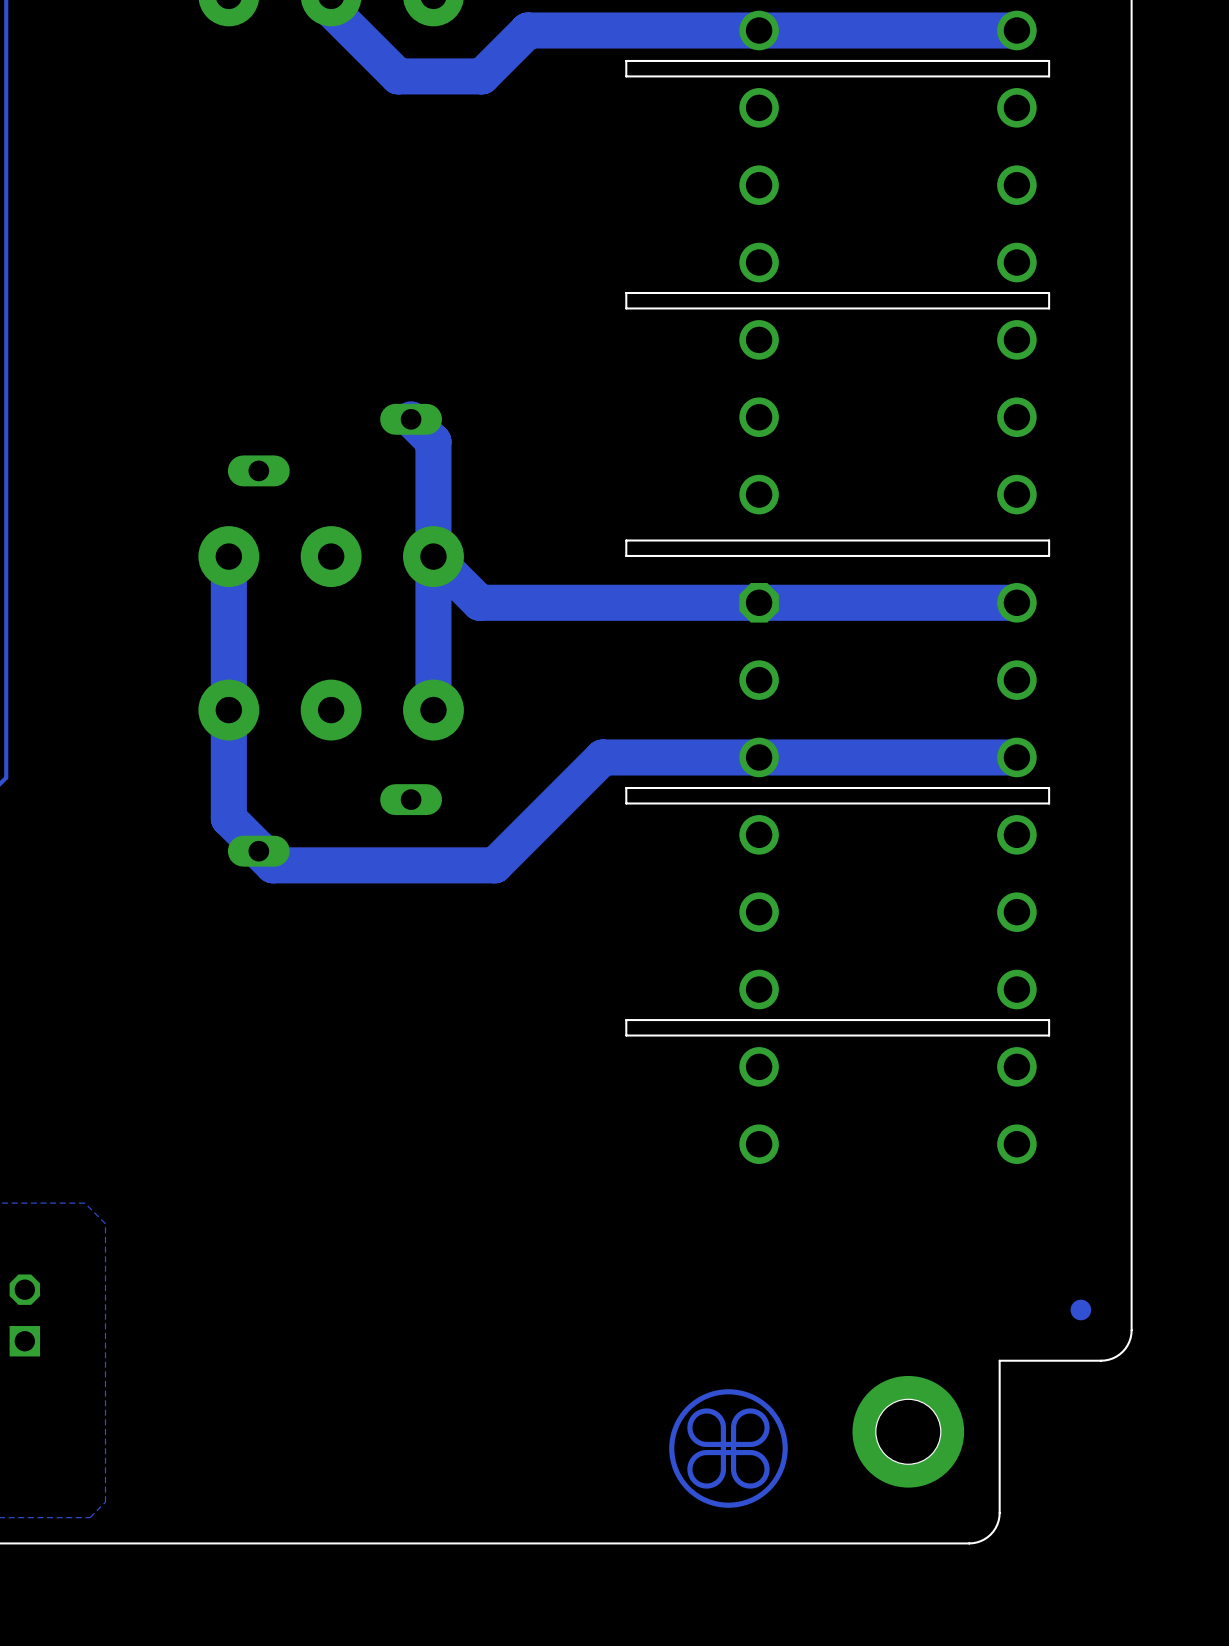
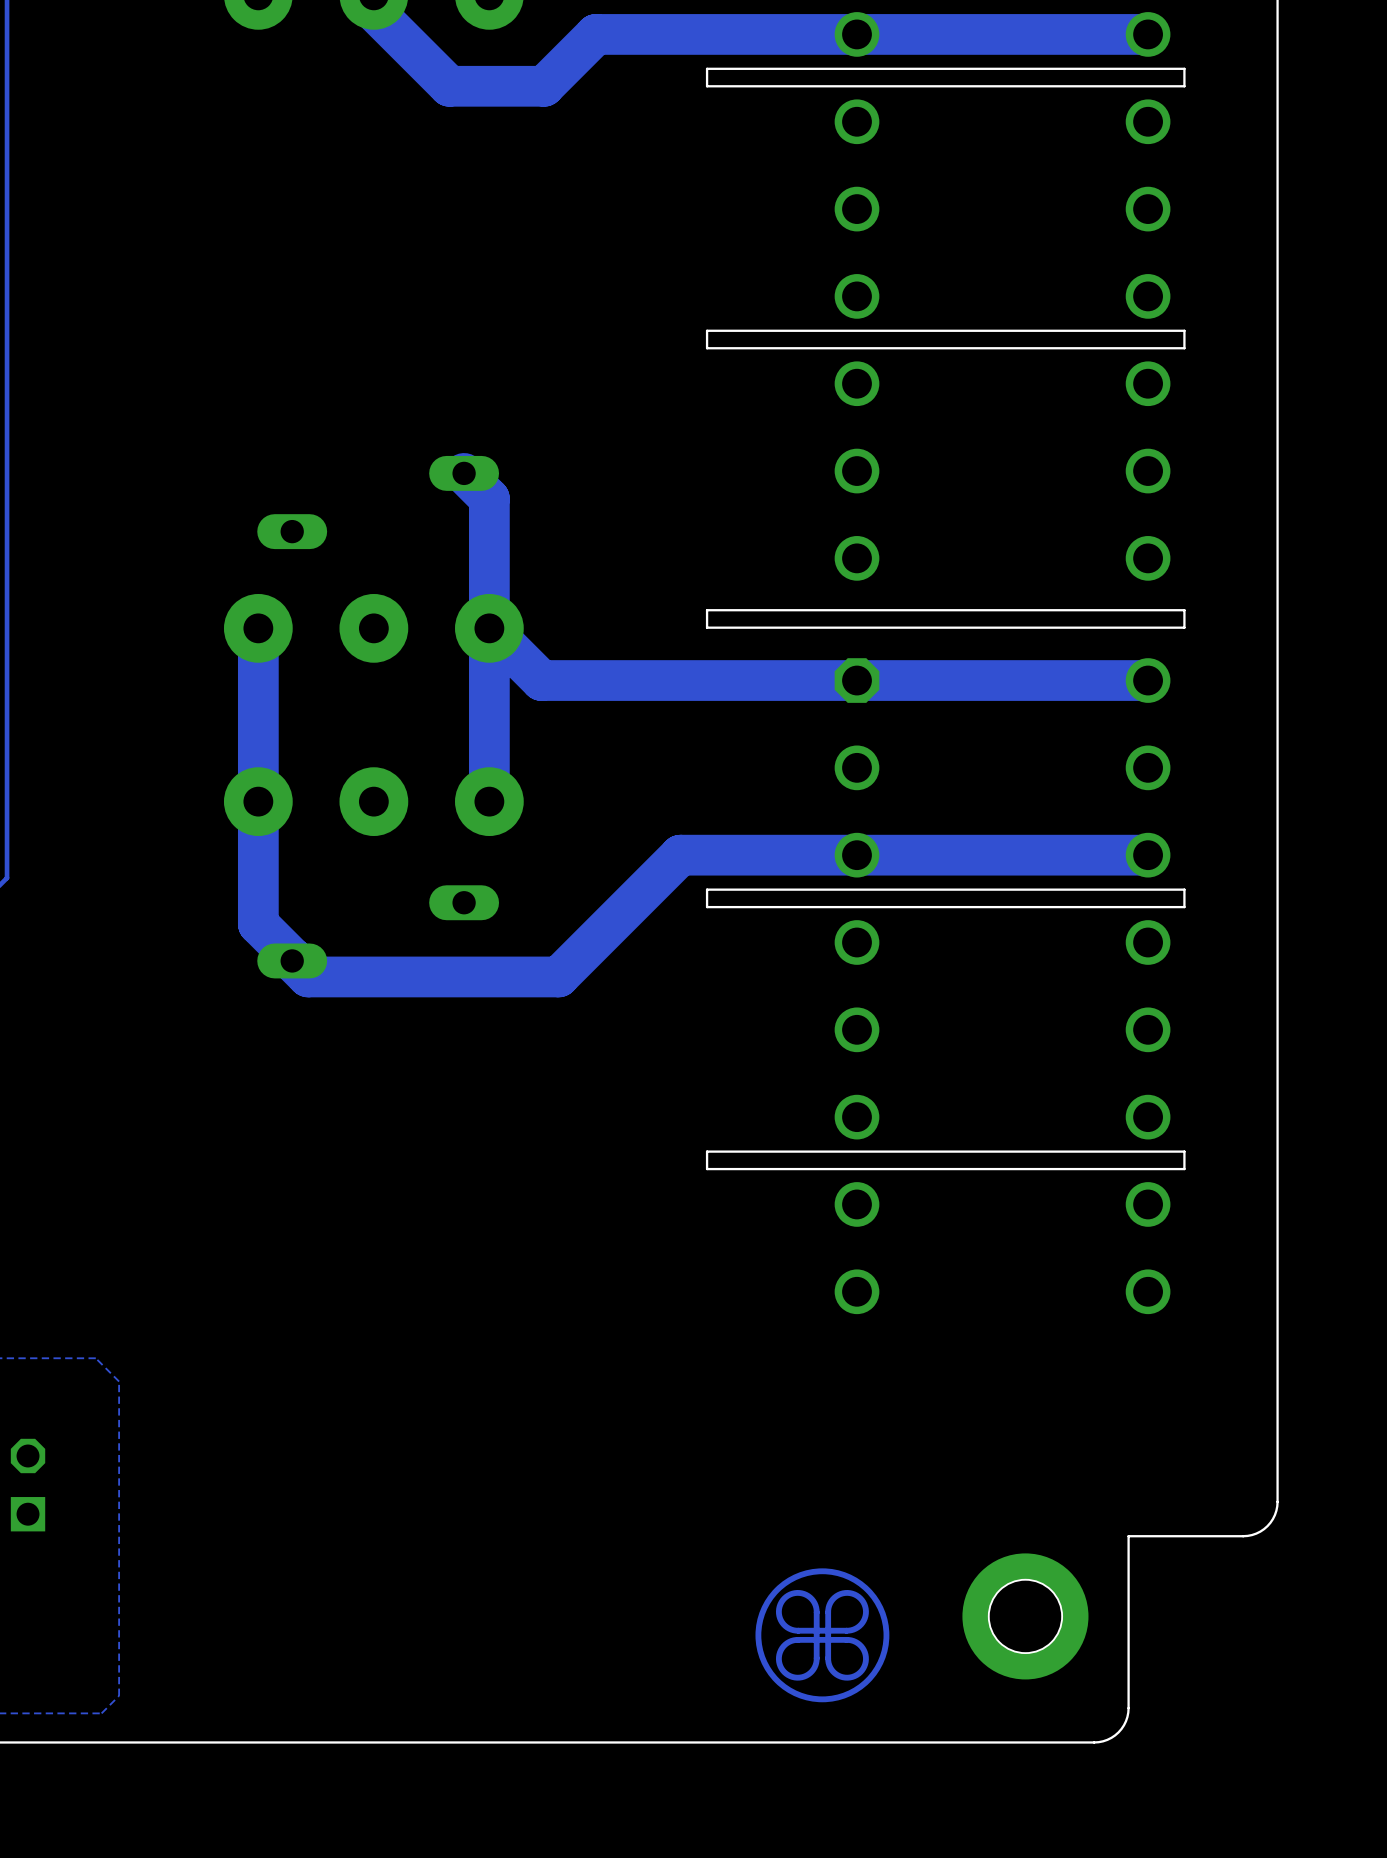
part: (1080, 1309) -> none

